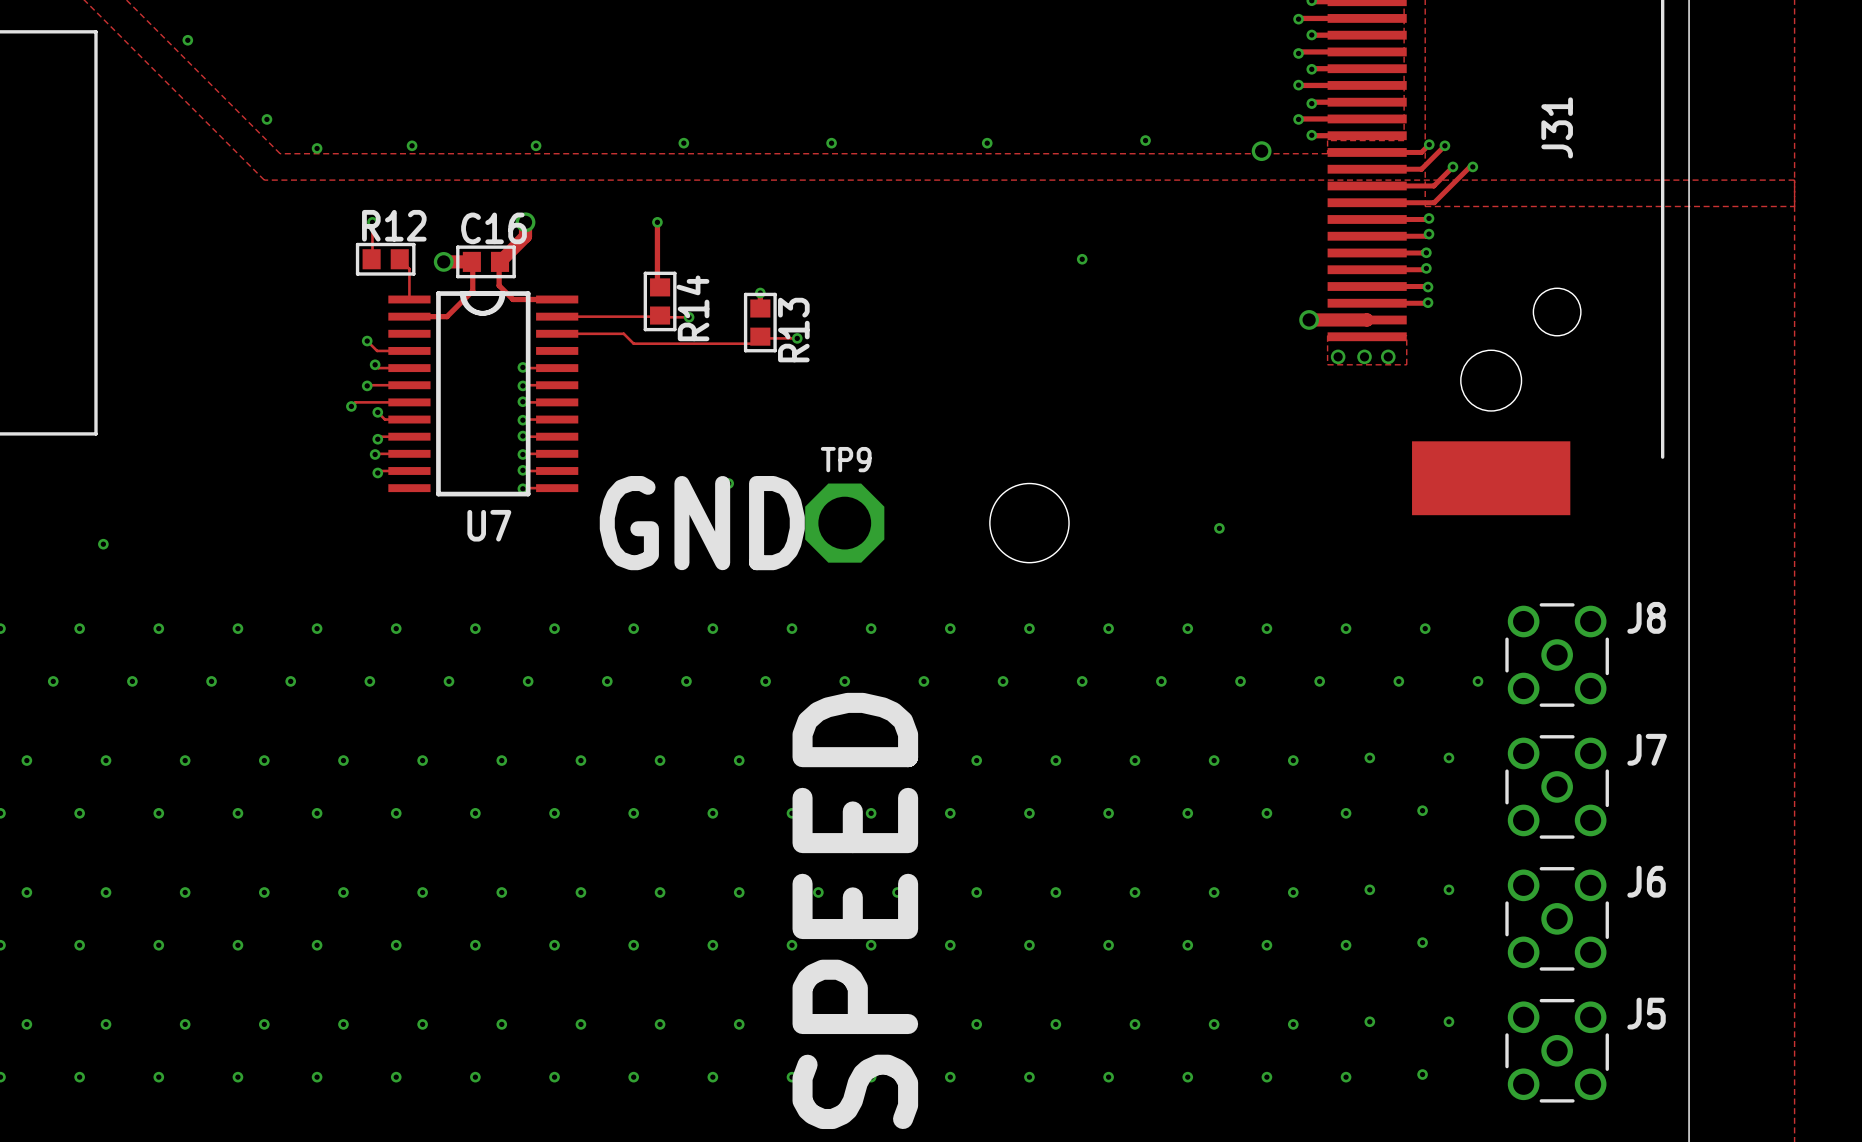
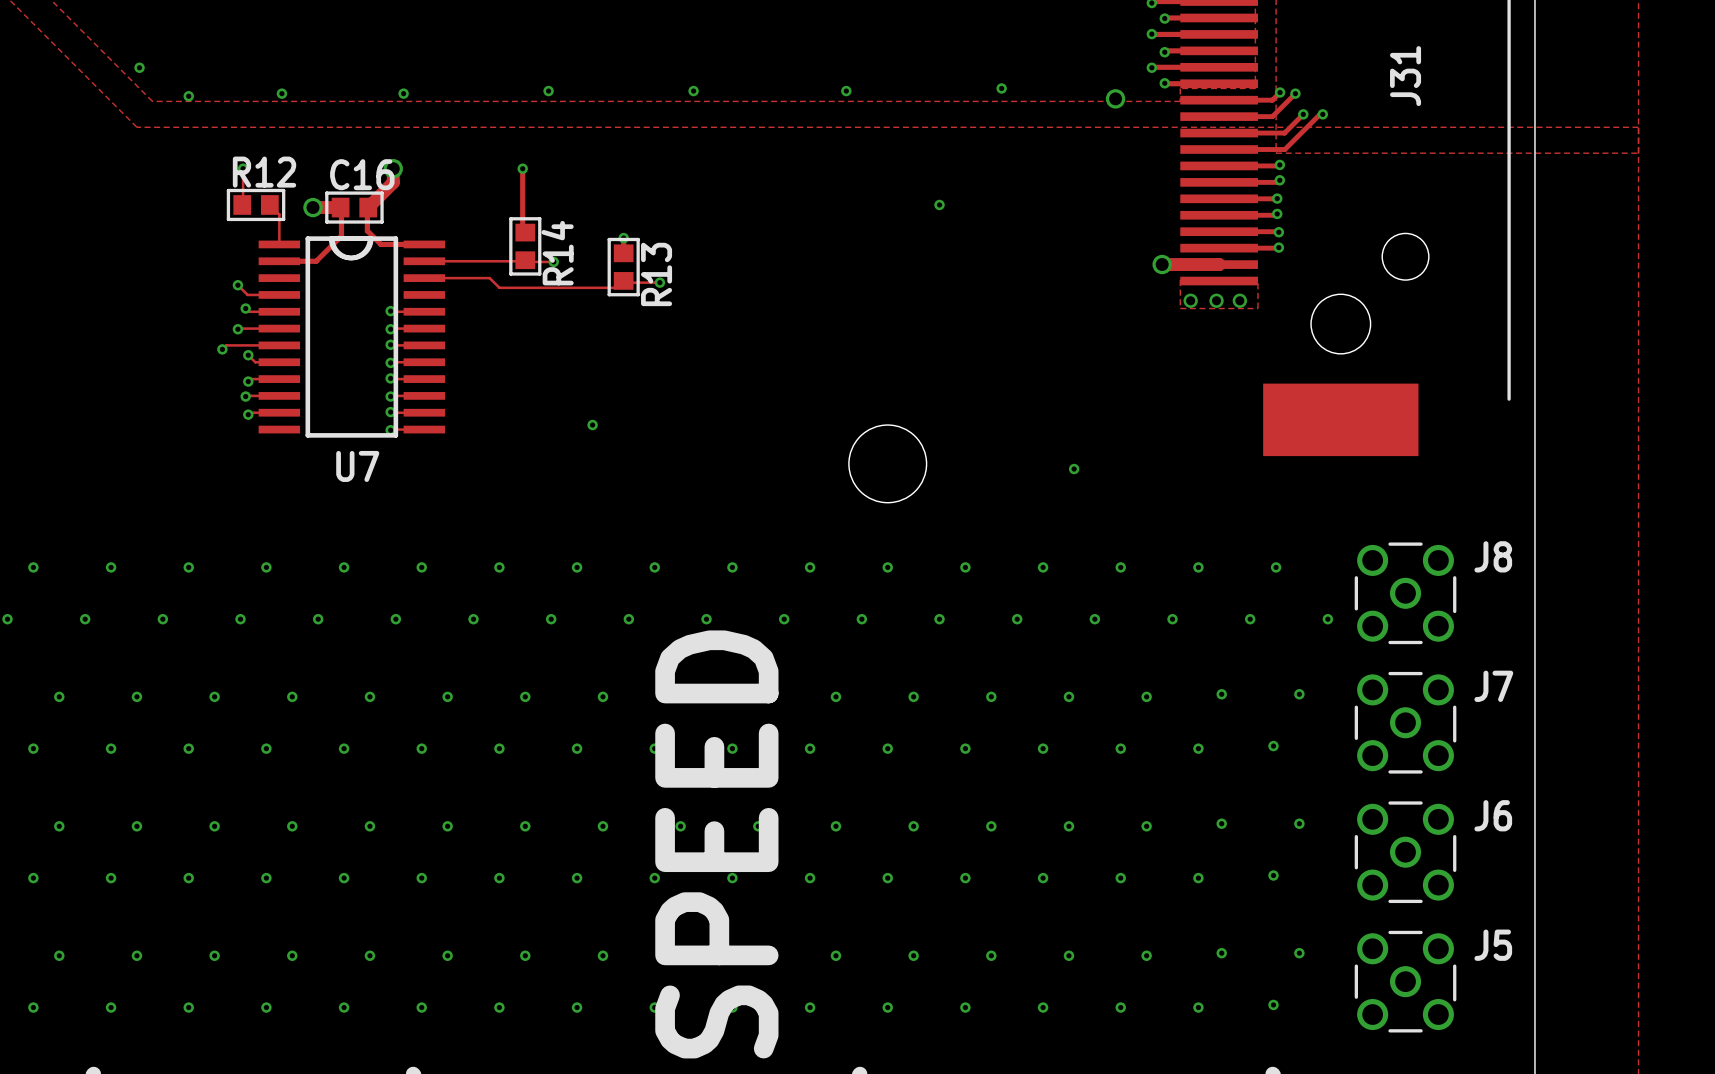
text: GND (702, 523) -> none
TP9: (844, 523) -> none

